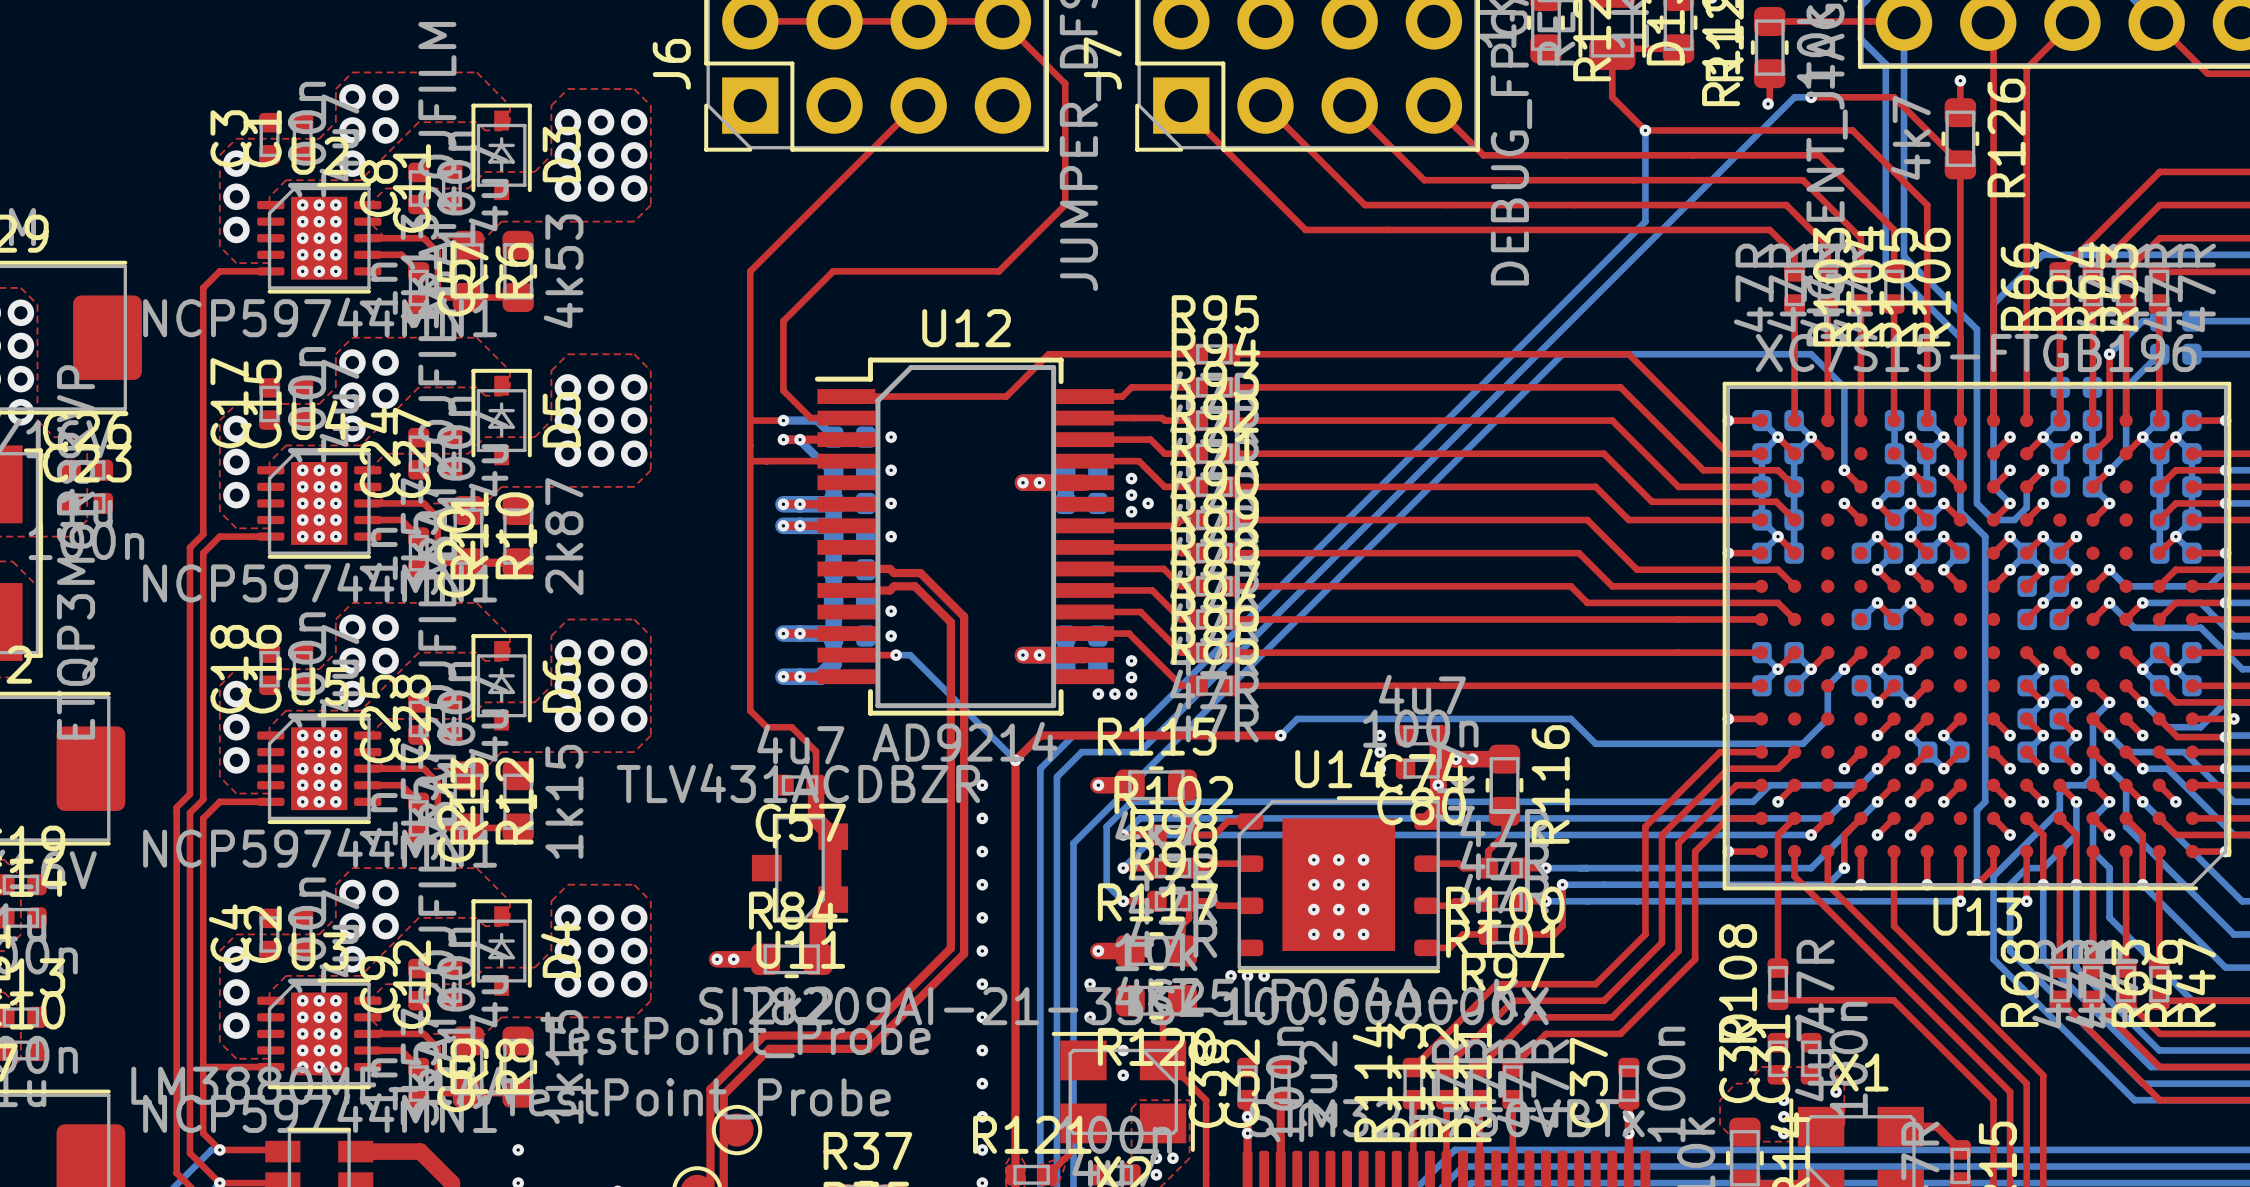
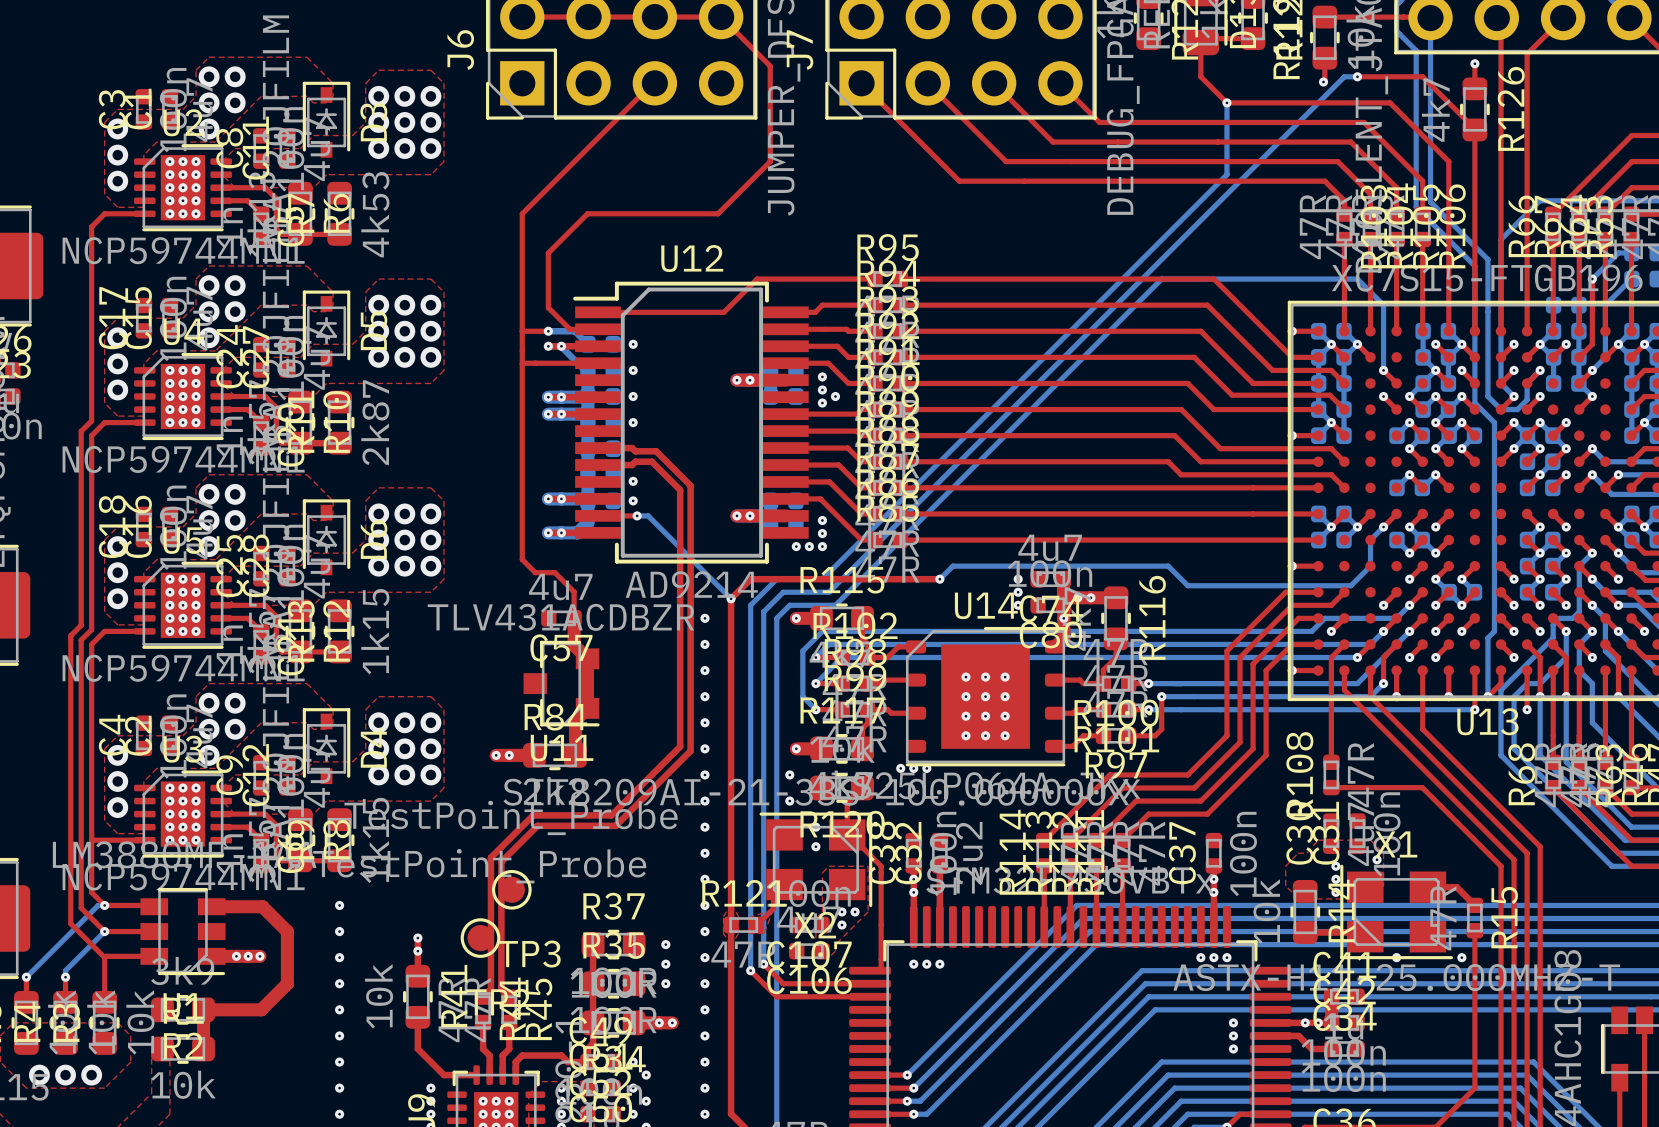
bottom track: (1148, 768) (1073, 843) -> (835, 605) (789, 605) (776, 618) (776, 664)

